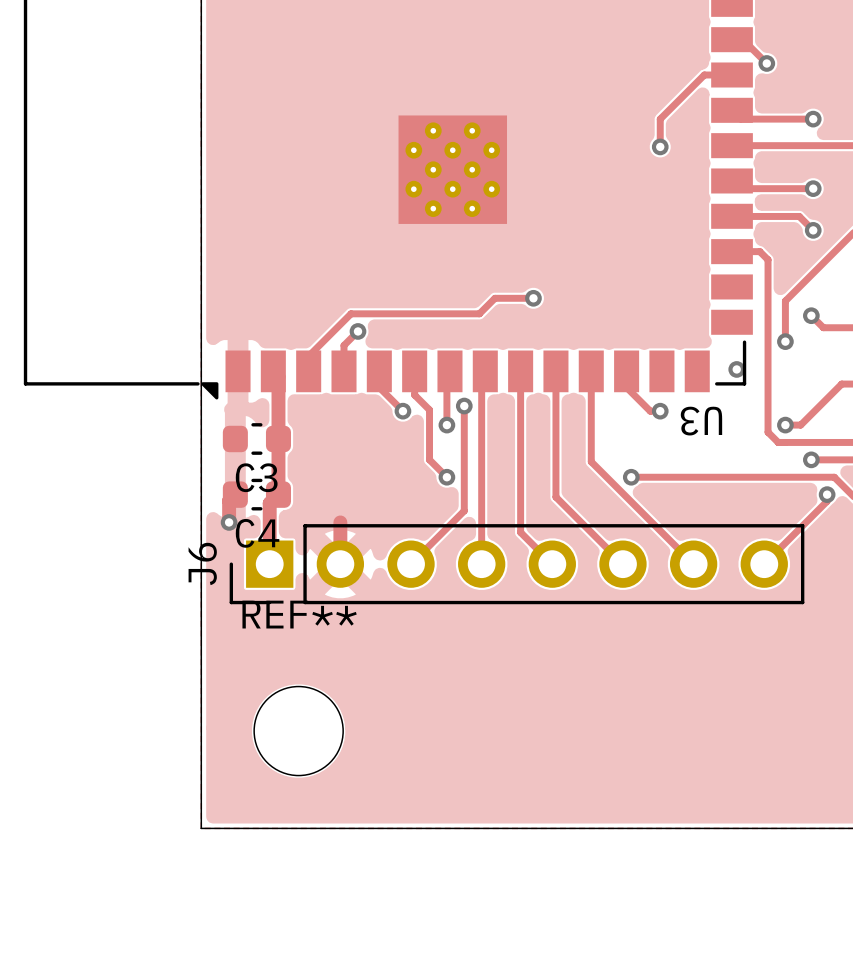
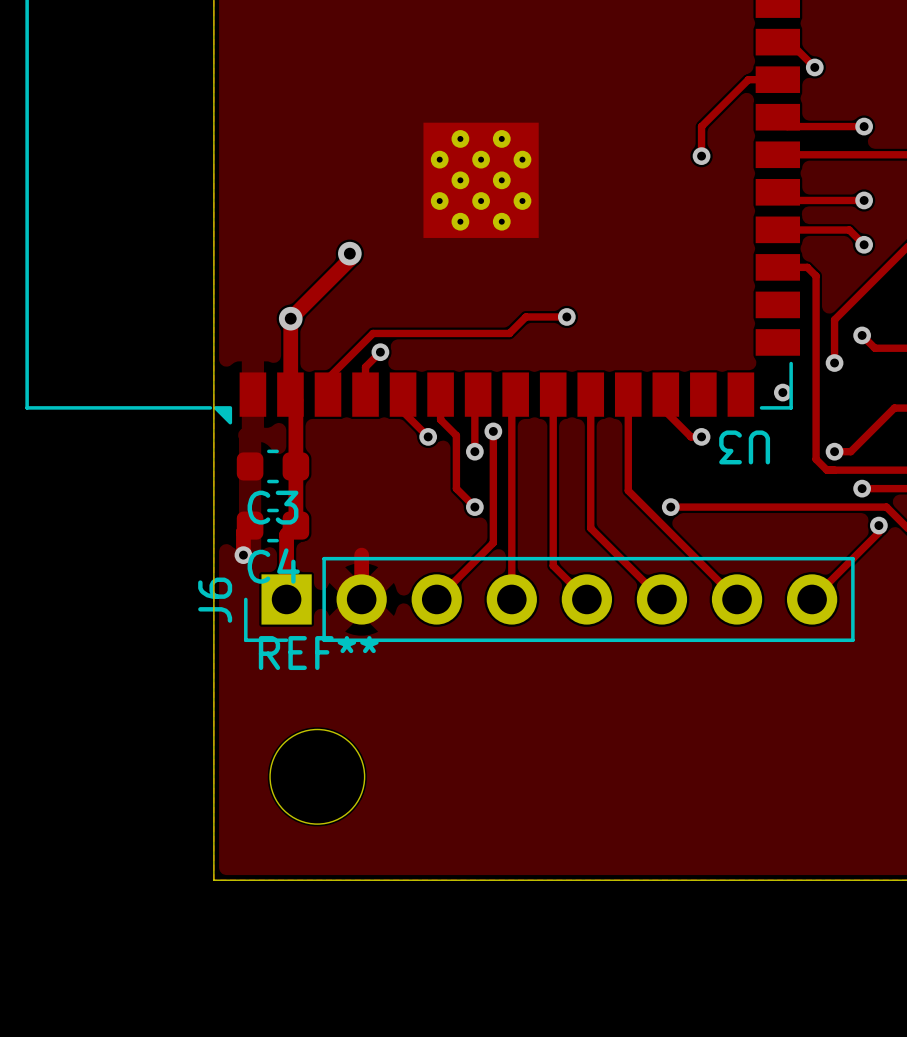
track: none -> (349, 253) (349, 259) (290, 318) (290, 394)
via: none -> (349, 253)
via: none -> (290, 318)

